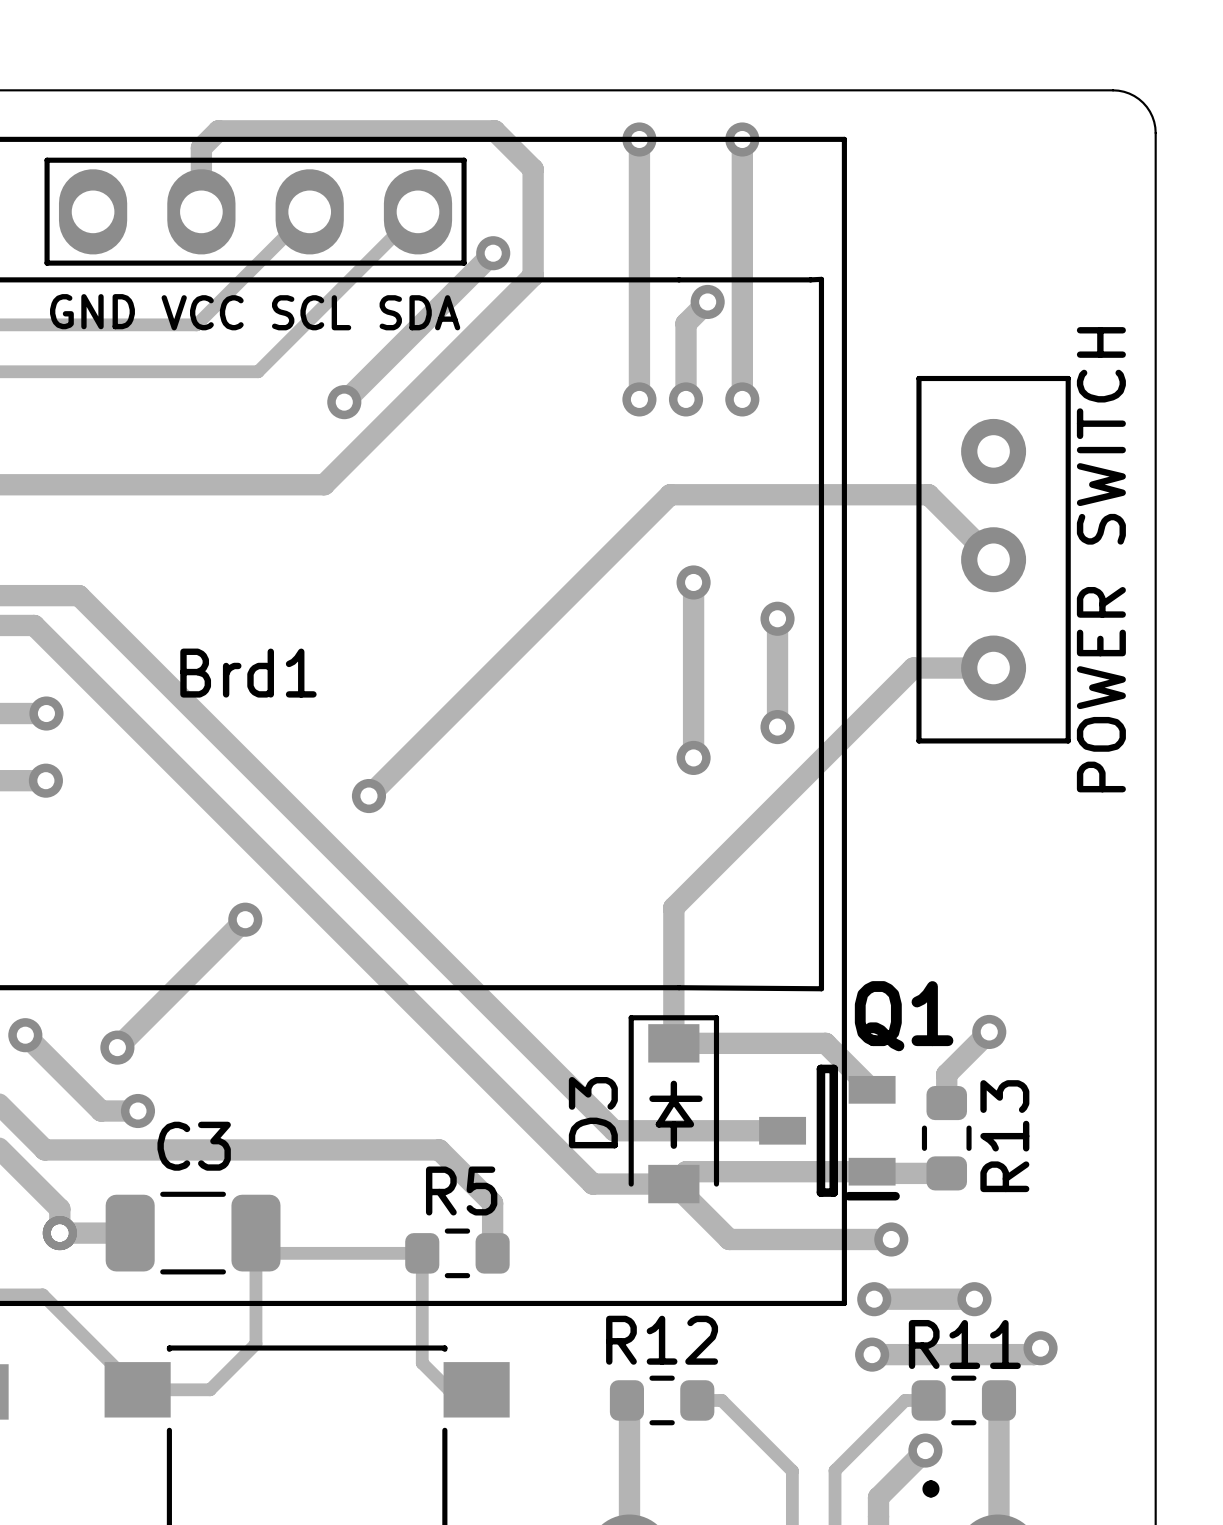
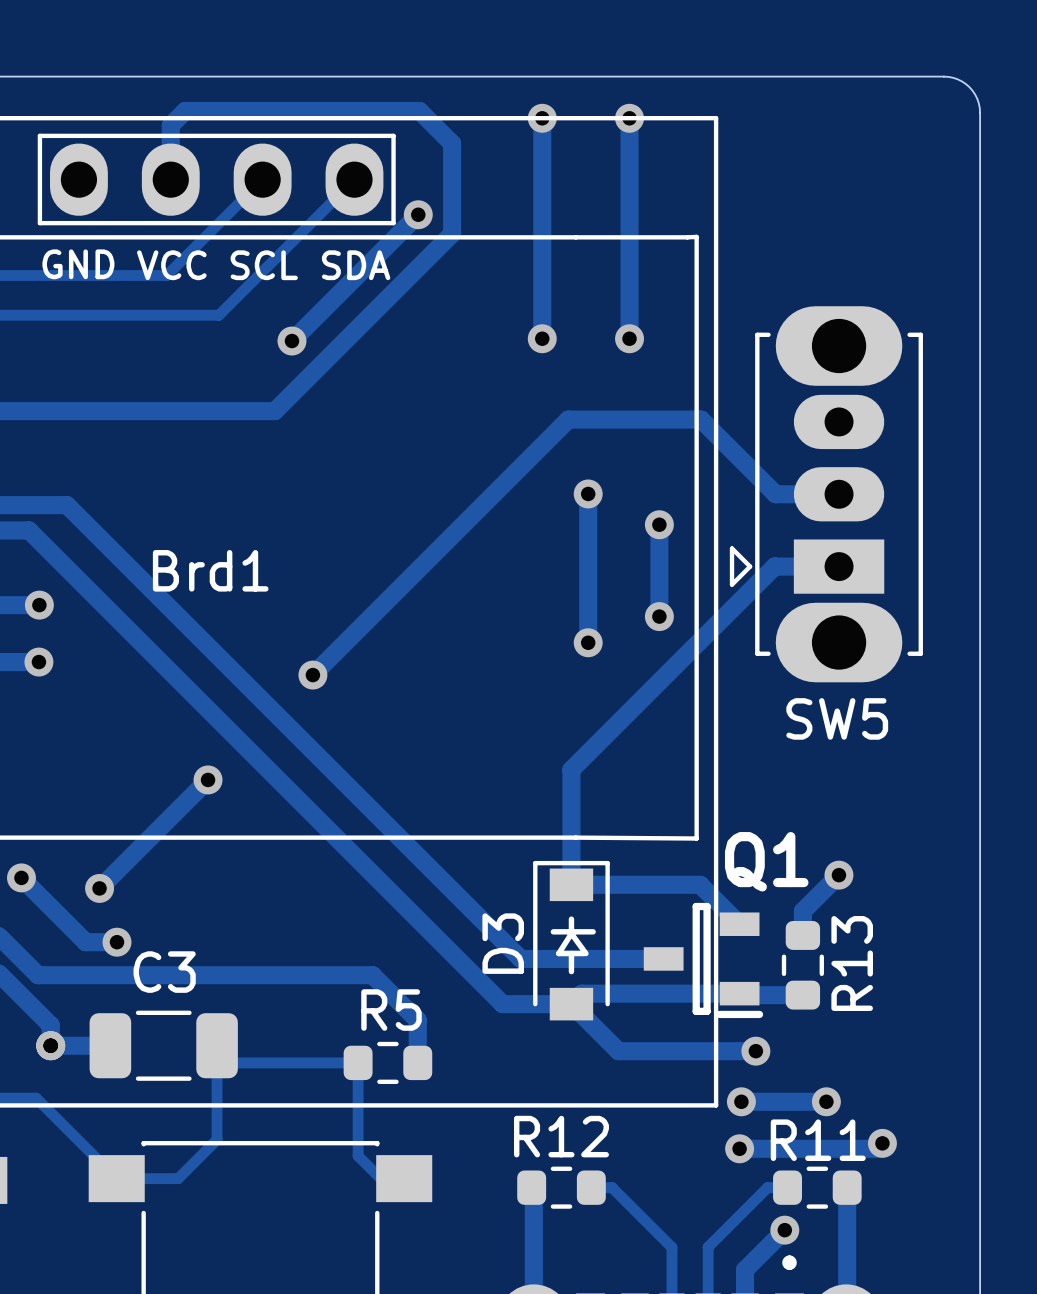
track: (707, 301) (686, 323) (686, 399) -> none
via: (707, 301) -> none
via: (686, 399) -> none
track: (826, 494) (928, 494) (993, 559) -> (701, 419) (775, 494) (839, 494)
part: POWER SWITCH (993, 559) -> none
SW5: none -> (826, 494)

